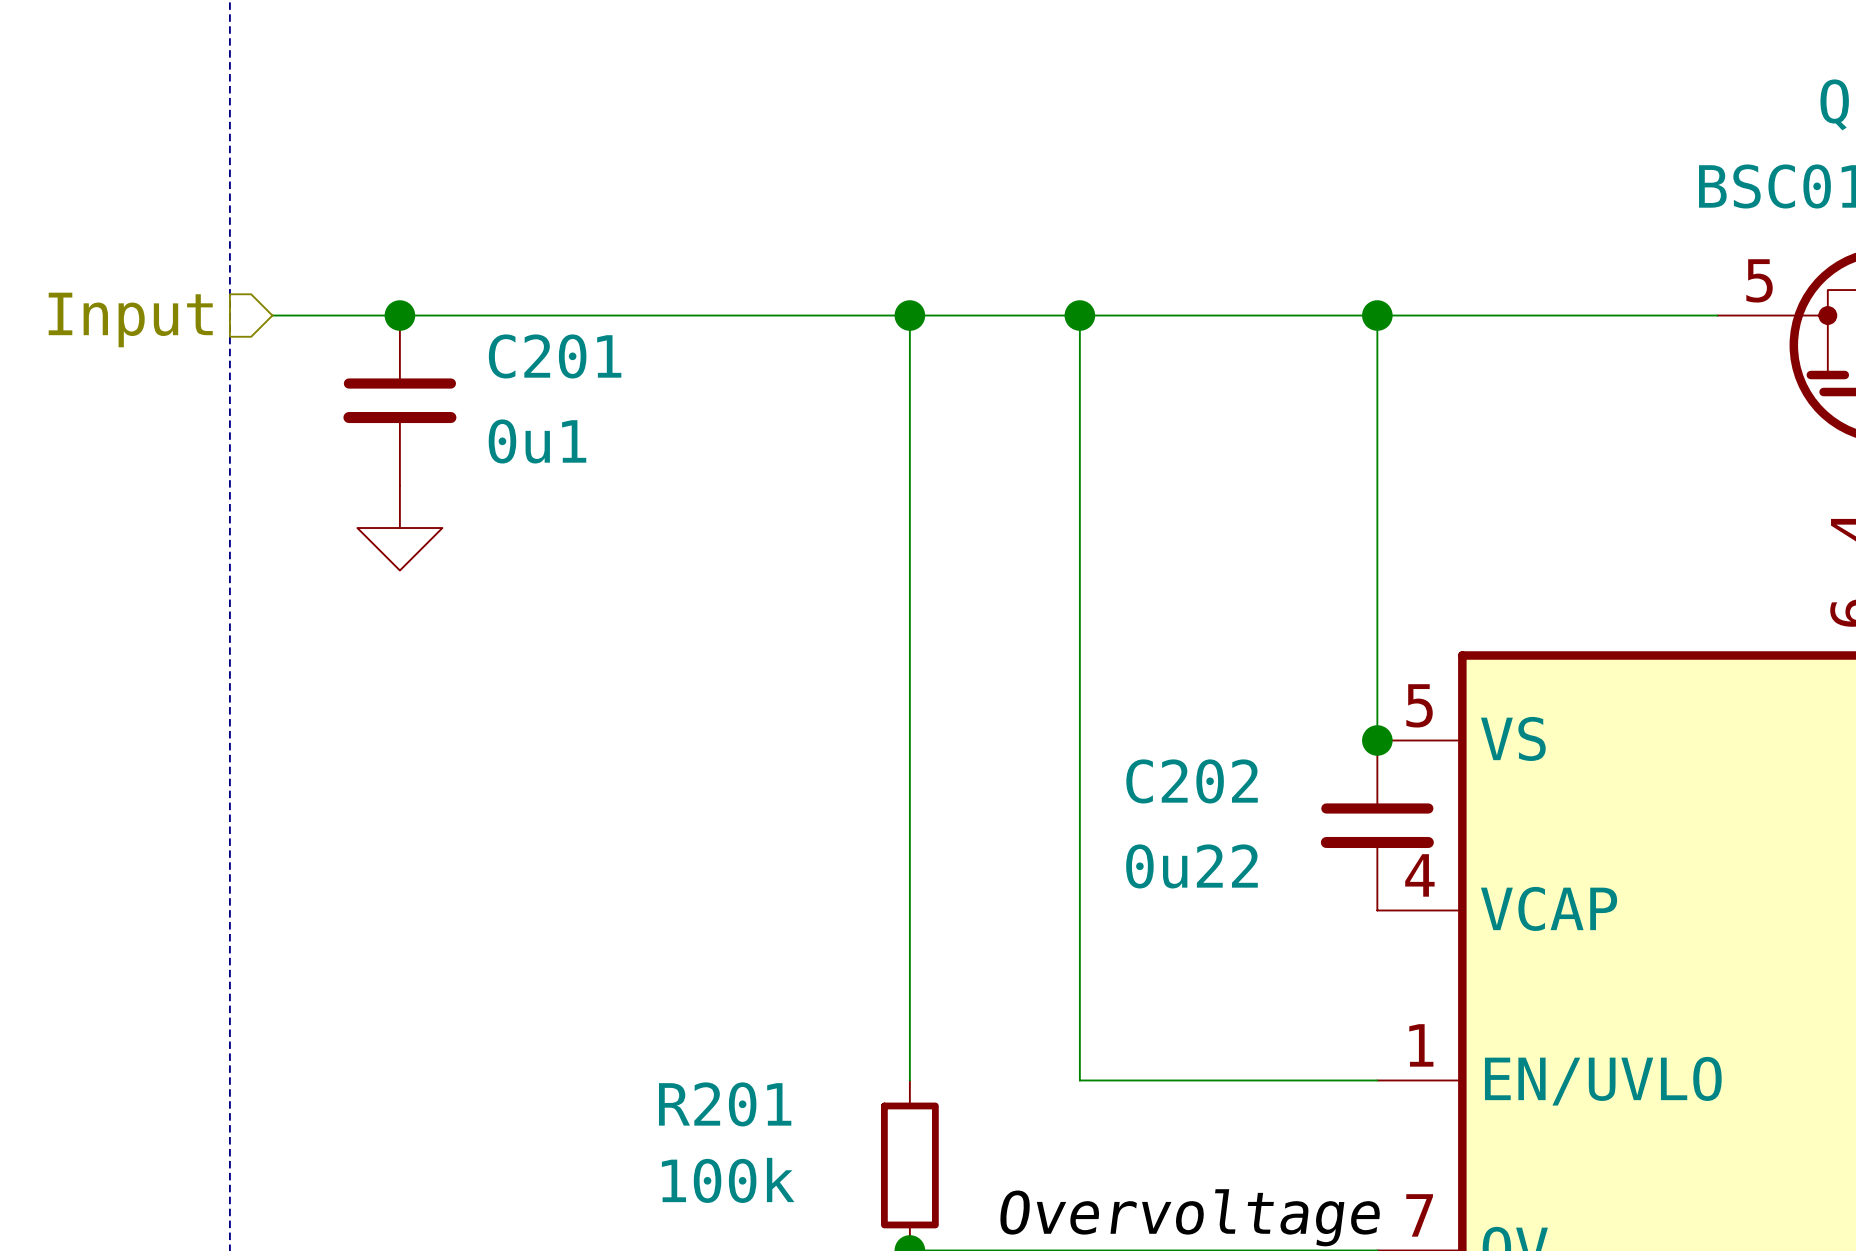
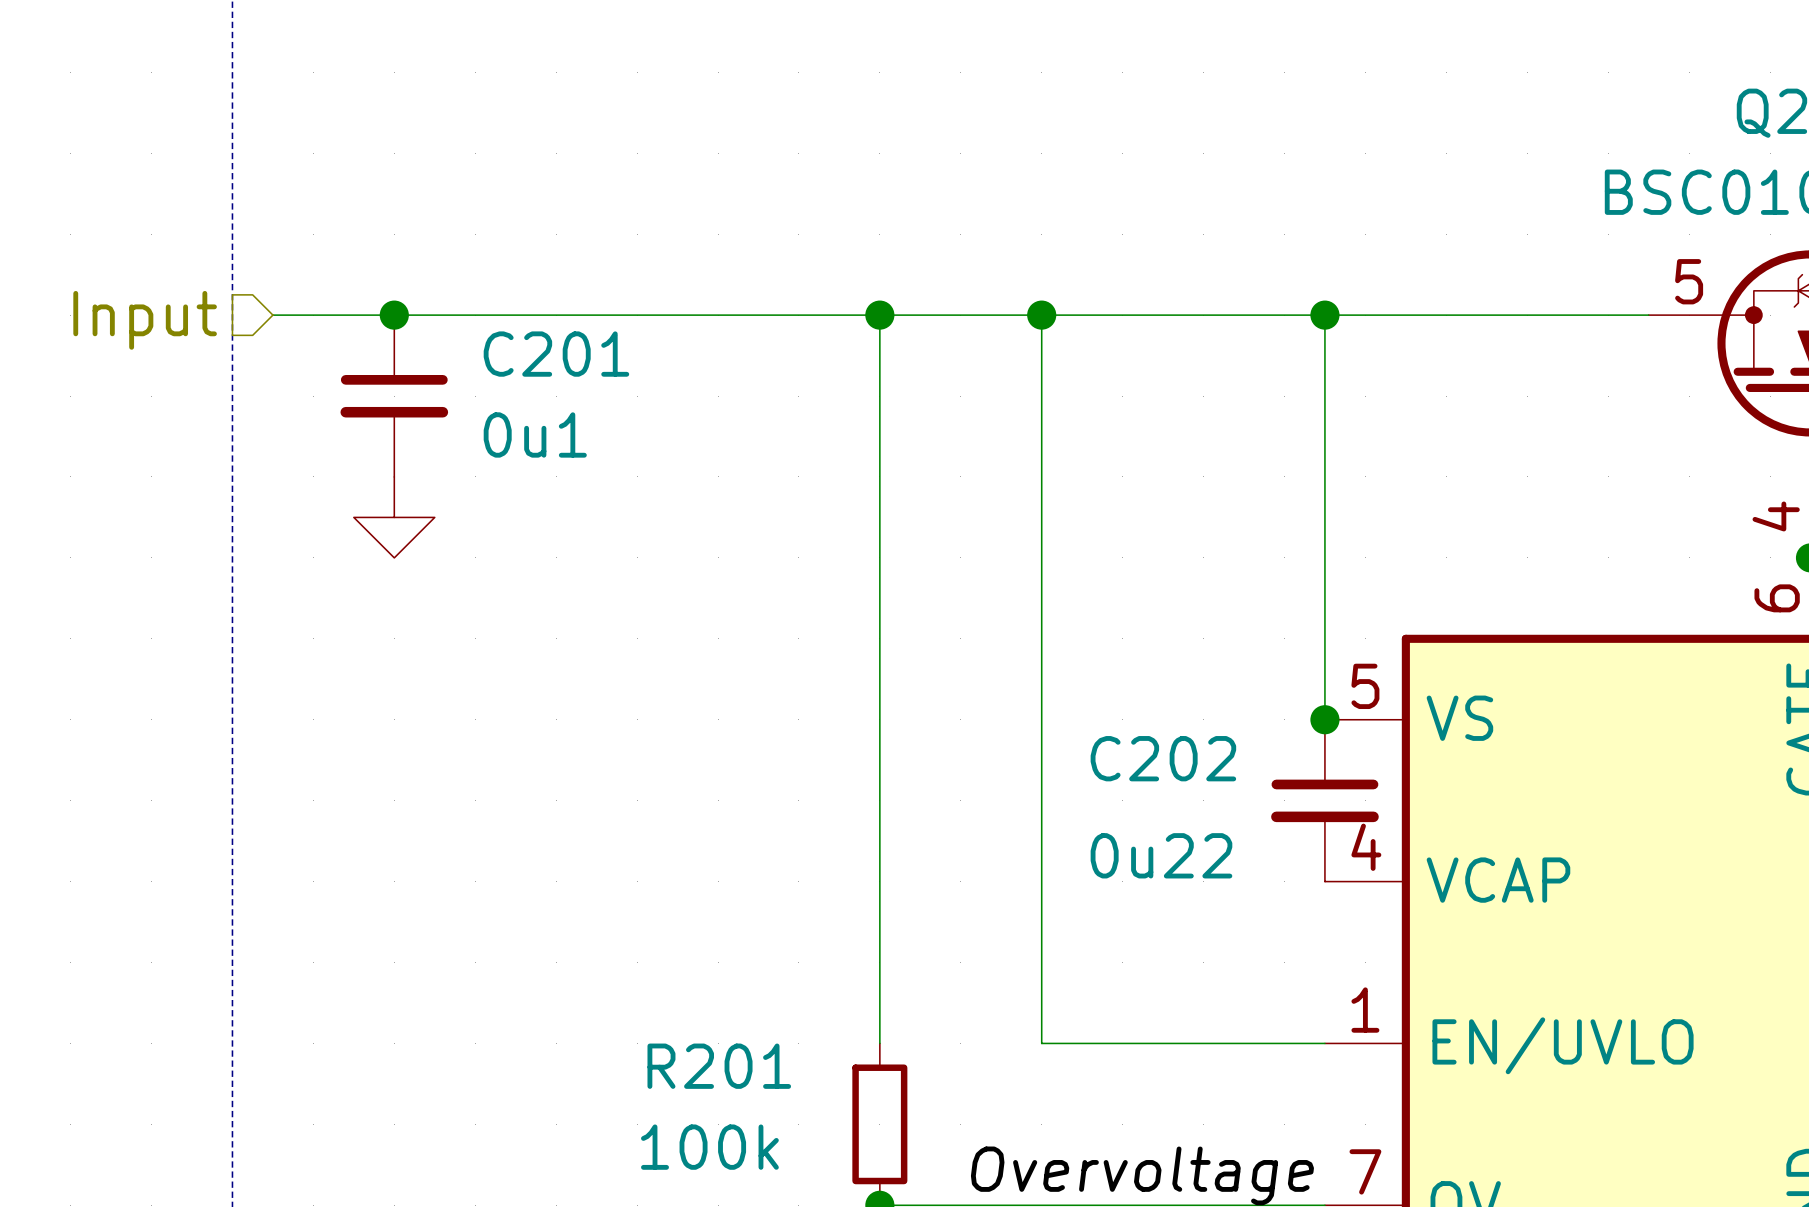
C202 value position: 0u22 (1191, 866) -> 0u22 (1161, 855)
R201 value position: 100k (728, 1180) -> 100k (709, 1147)

